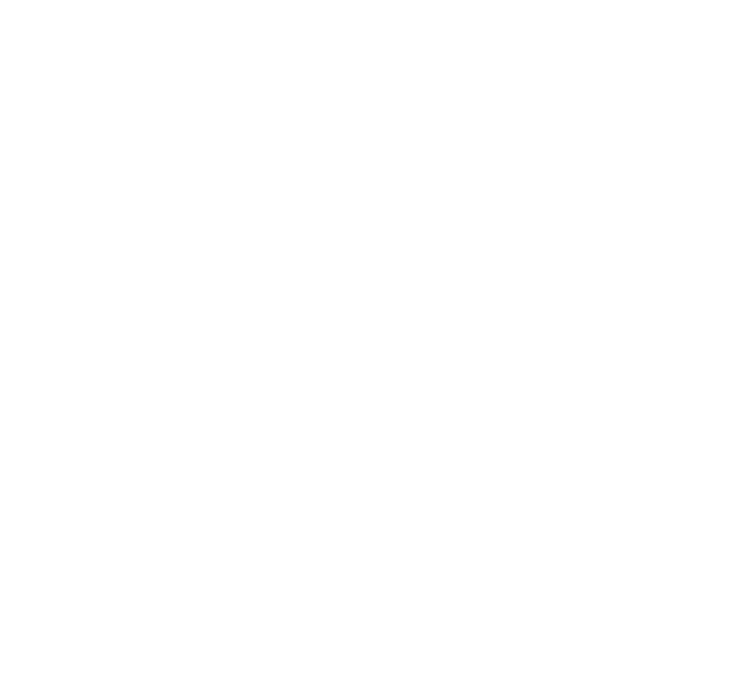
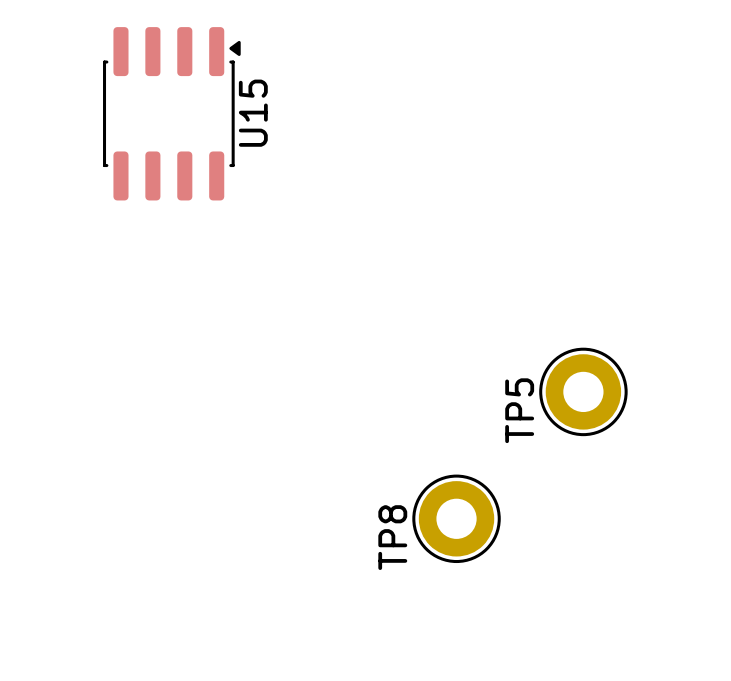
U15: none -> (171, 113)
TP5: none -> (583, 391)
TP8: none -> (456, 518)

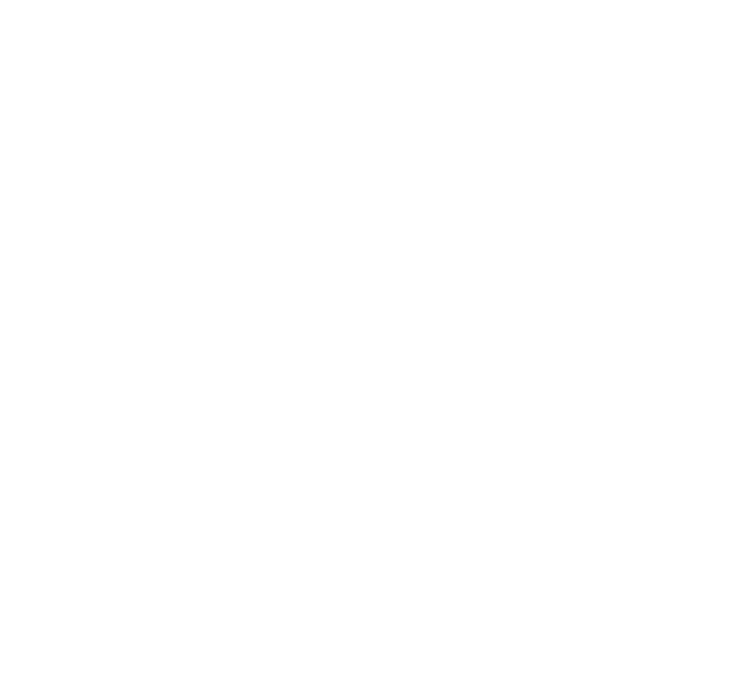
U15: (171, 113) -> none
TP5: (583, 391) -> none
TP8: (456, 518) -> none

